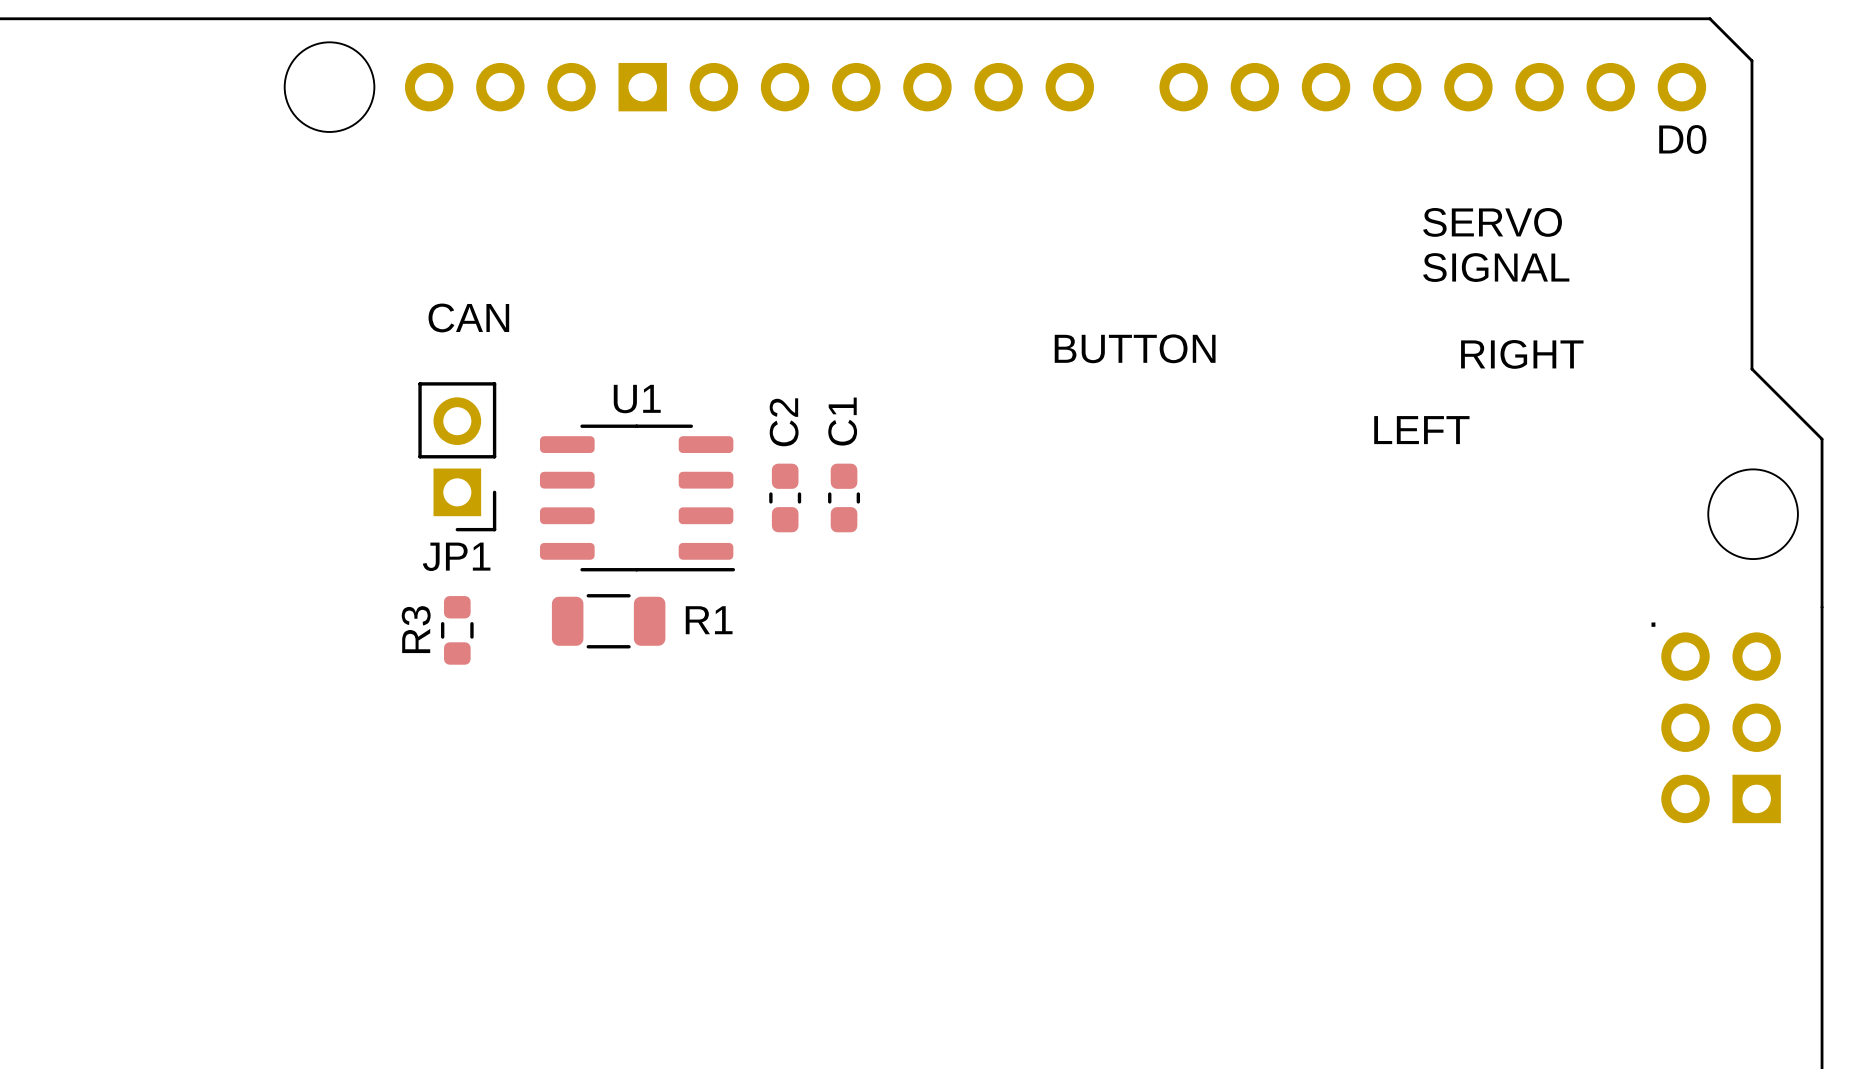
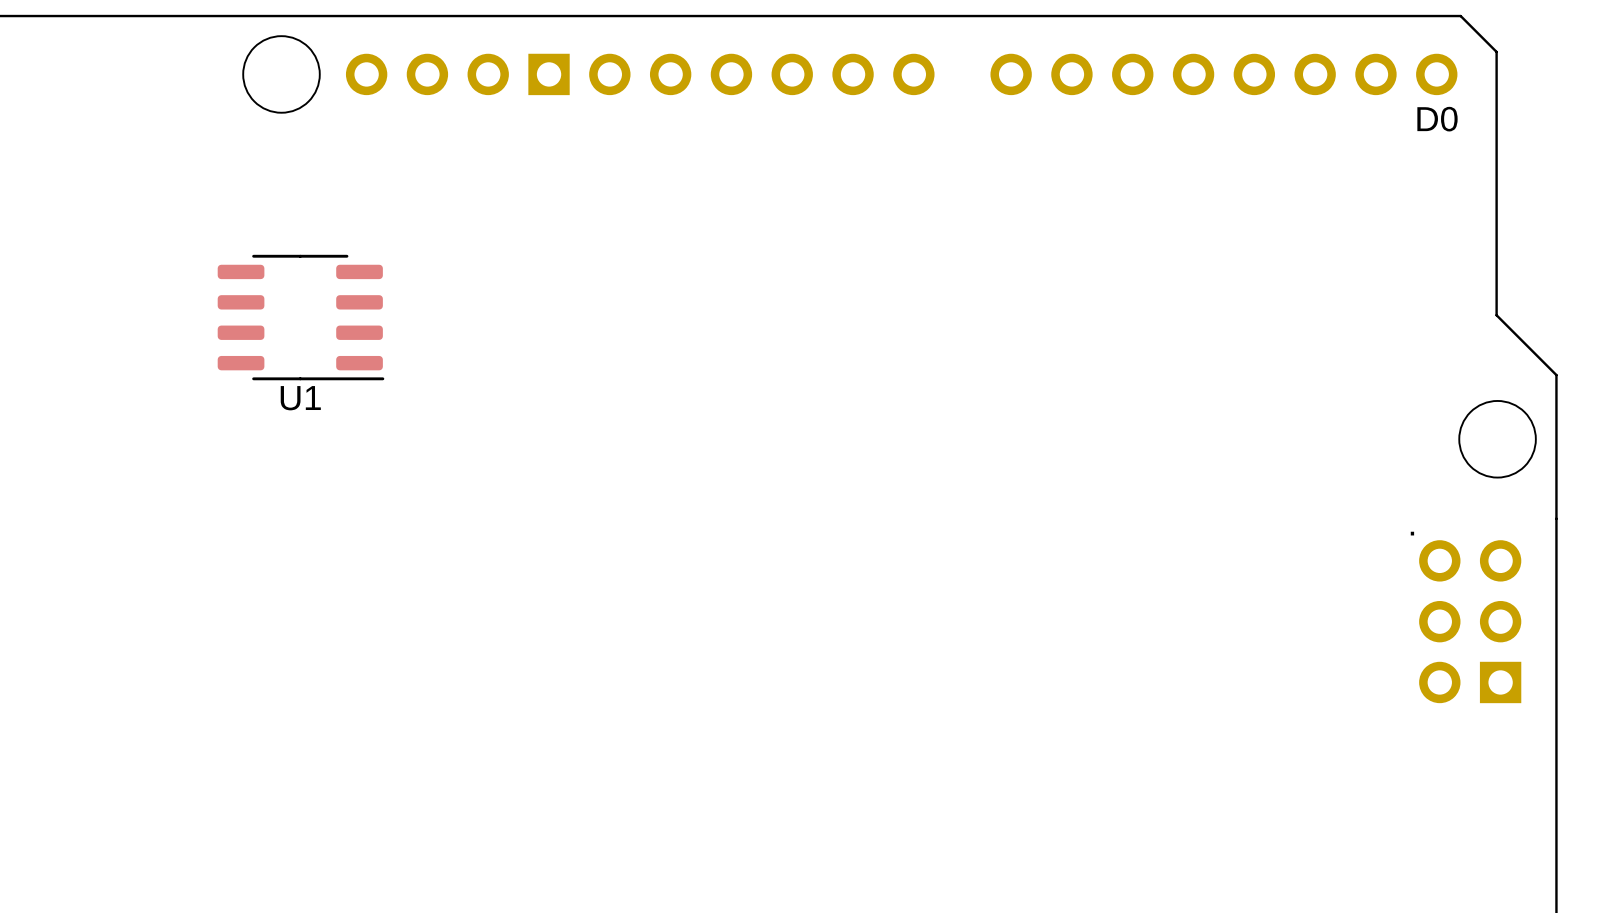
text: SERVO (1492, 222) -> none
text: SIGNAL (1496, 267) -> none
text: CAN (468, 317) -> none
text: BUTTON (1135, 348) -> none
text: RIGHT (1522, 354) -> none
U1 name position: U1 (637, 399) -> U1 (300, 398)
text: LEFT (1421, 430) -> none
JP1: (457, 456) -> none
U1 position: (637, 497) -> (301, 317)
C2: (785, 497) -> none
C1: (844, 497) -> none
R1: (608, 621) -> none
R3: (457, 630) -> none

